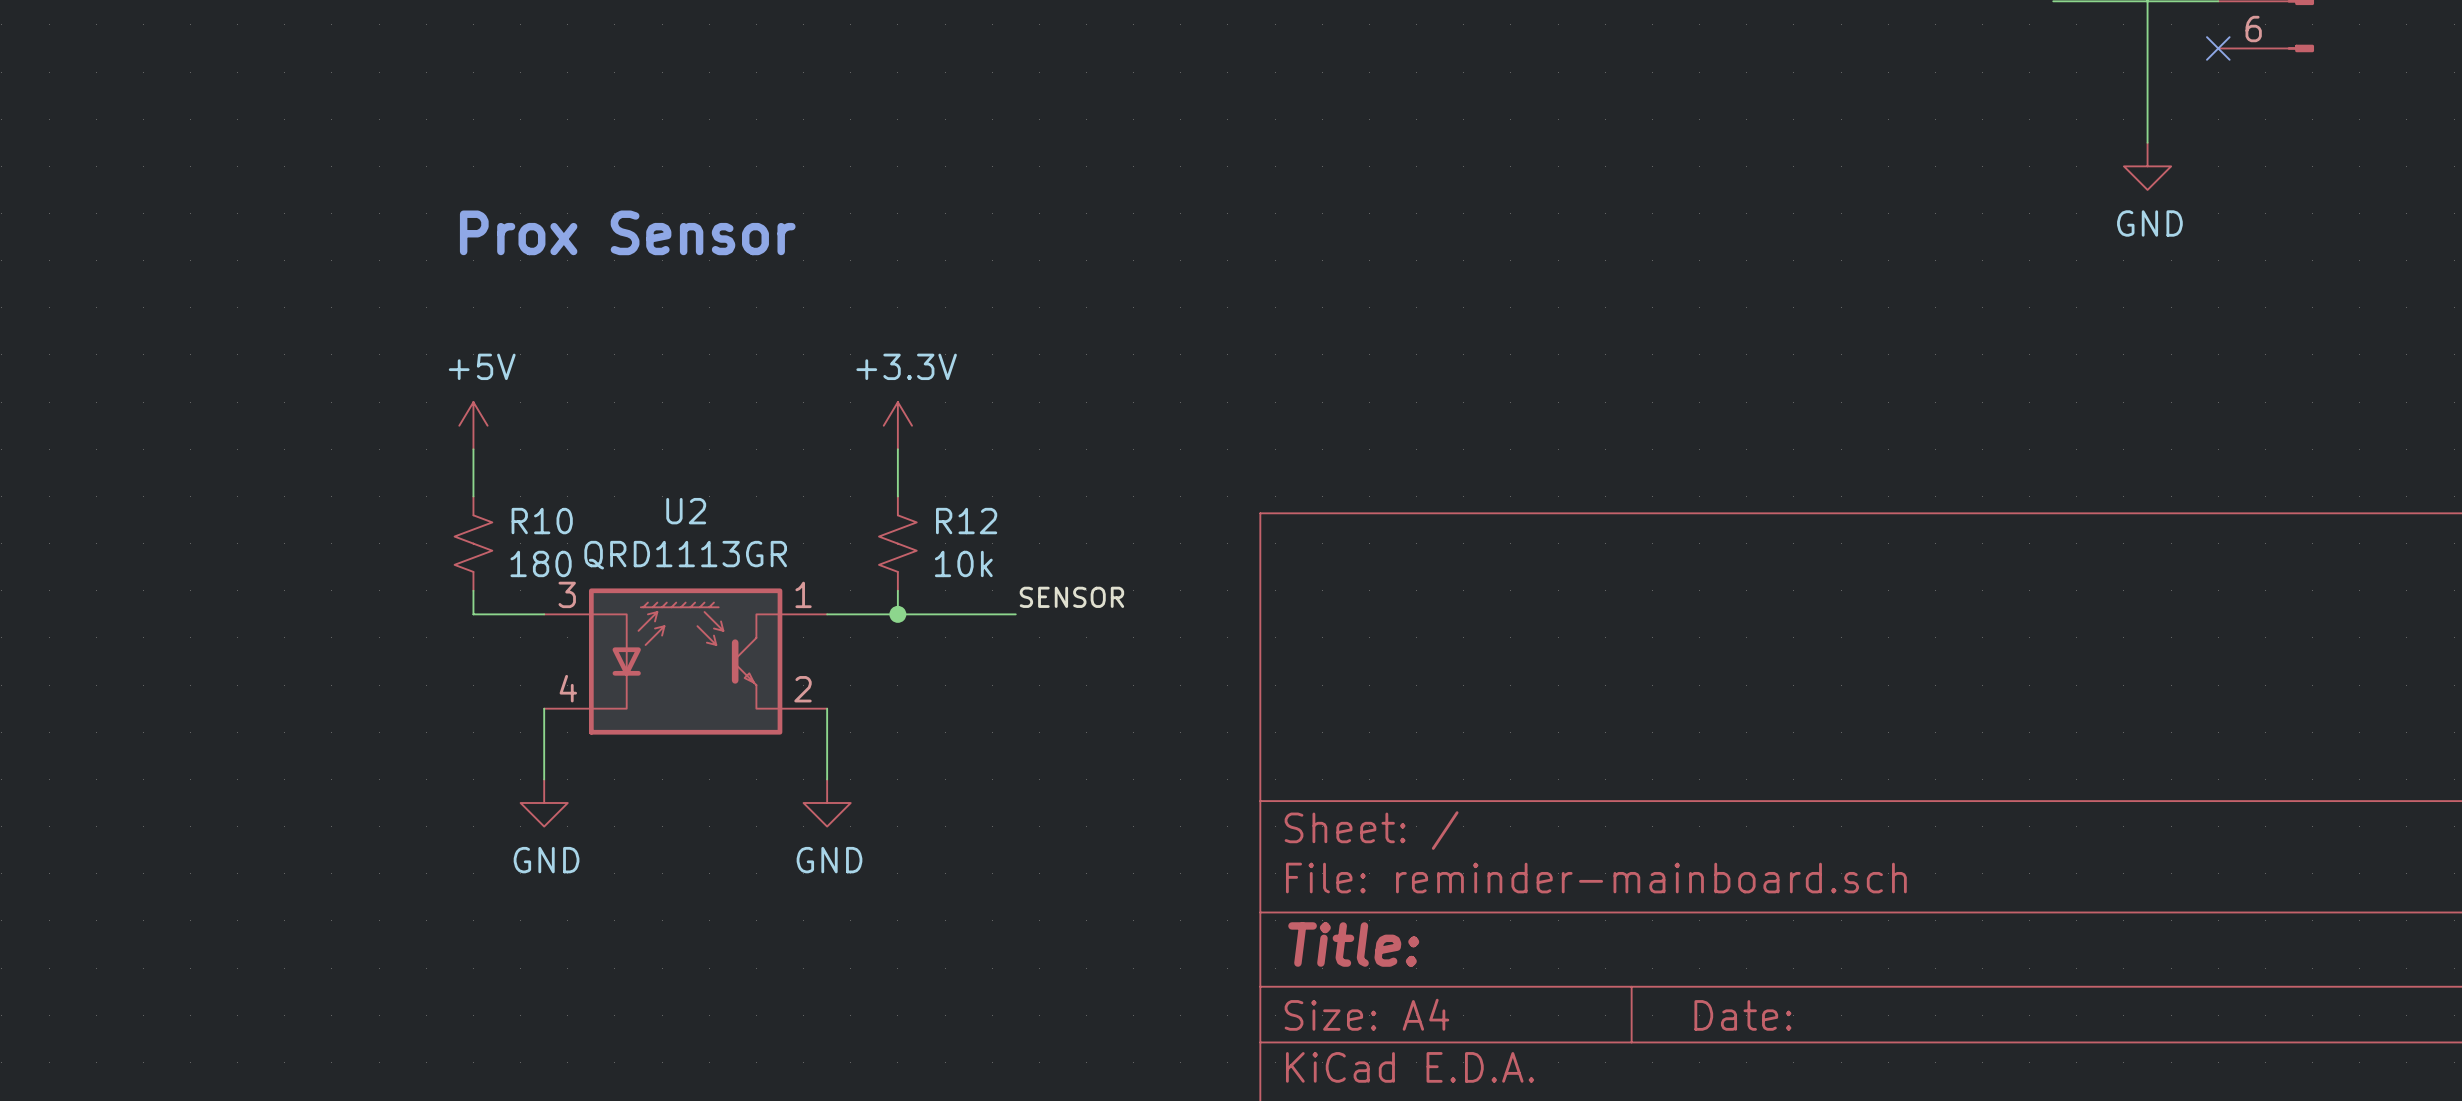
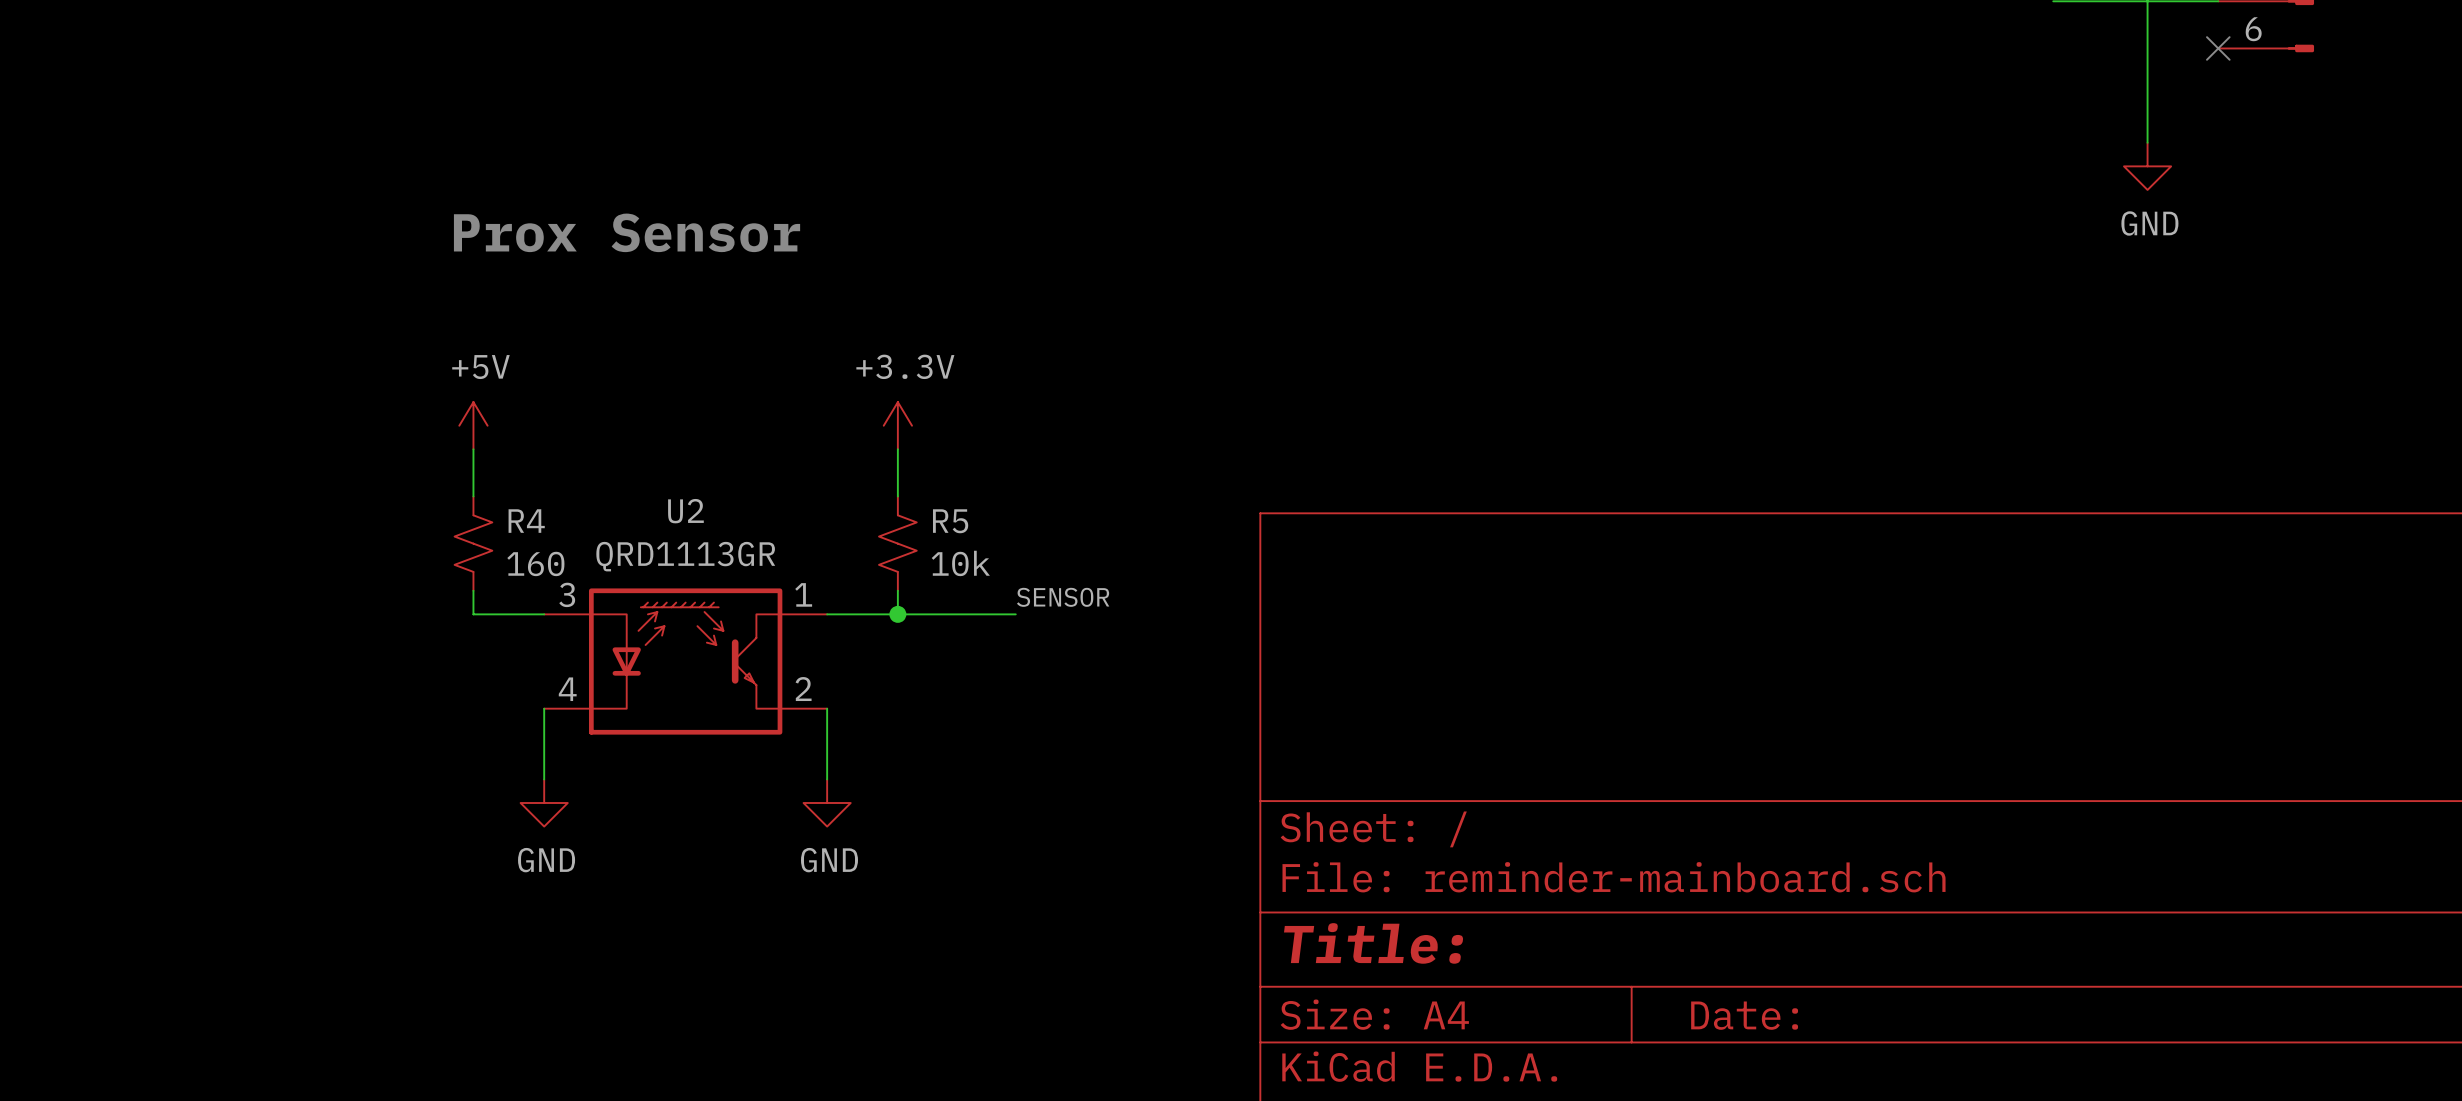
R10 name: R10 (542, 521) -> R4 (526, 521)
R12 name: R12 (966, 521) -> R5 (950, 521)
R10 value: 180 (541, 563) -> 160 (535, 563)

